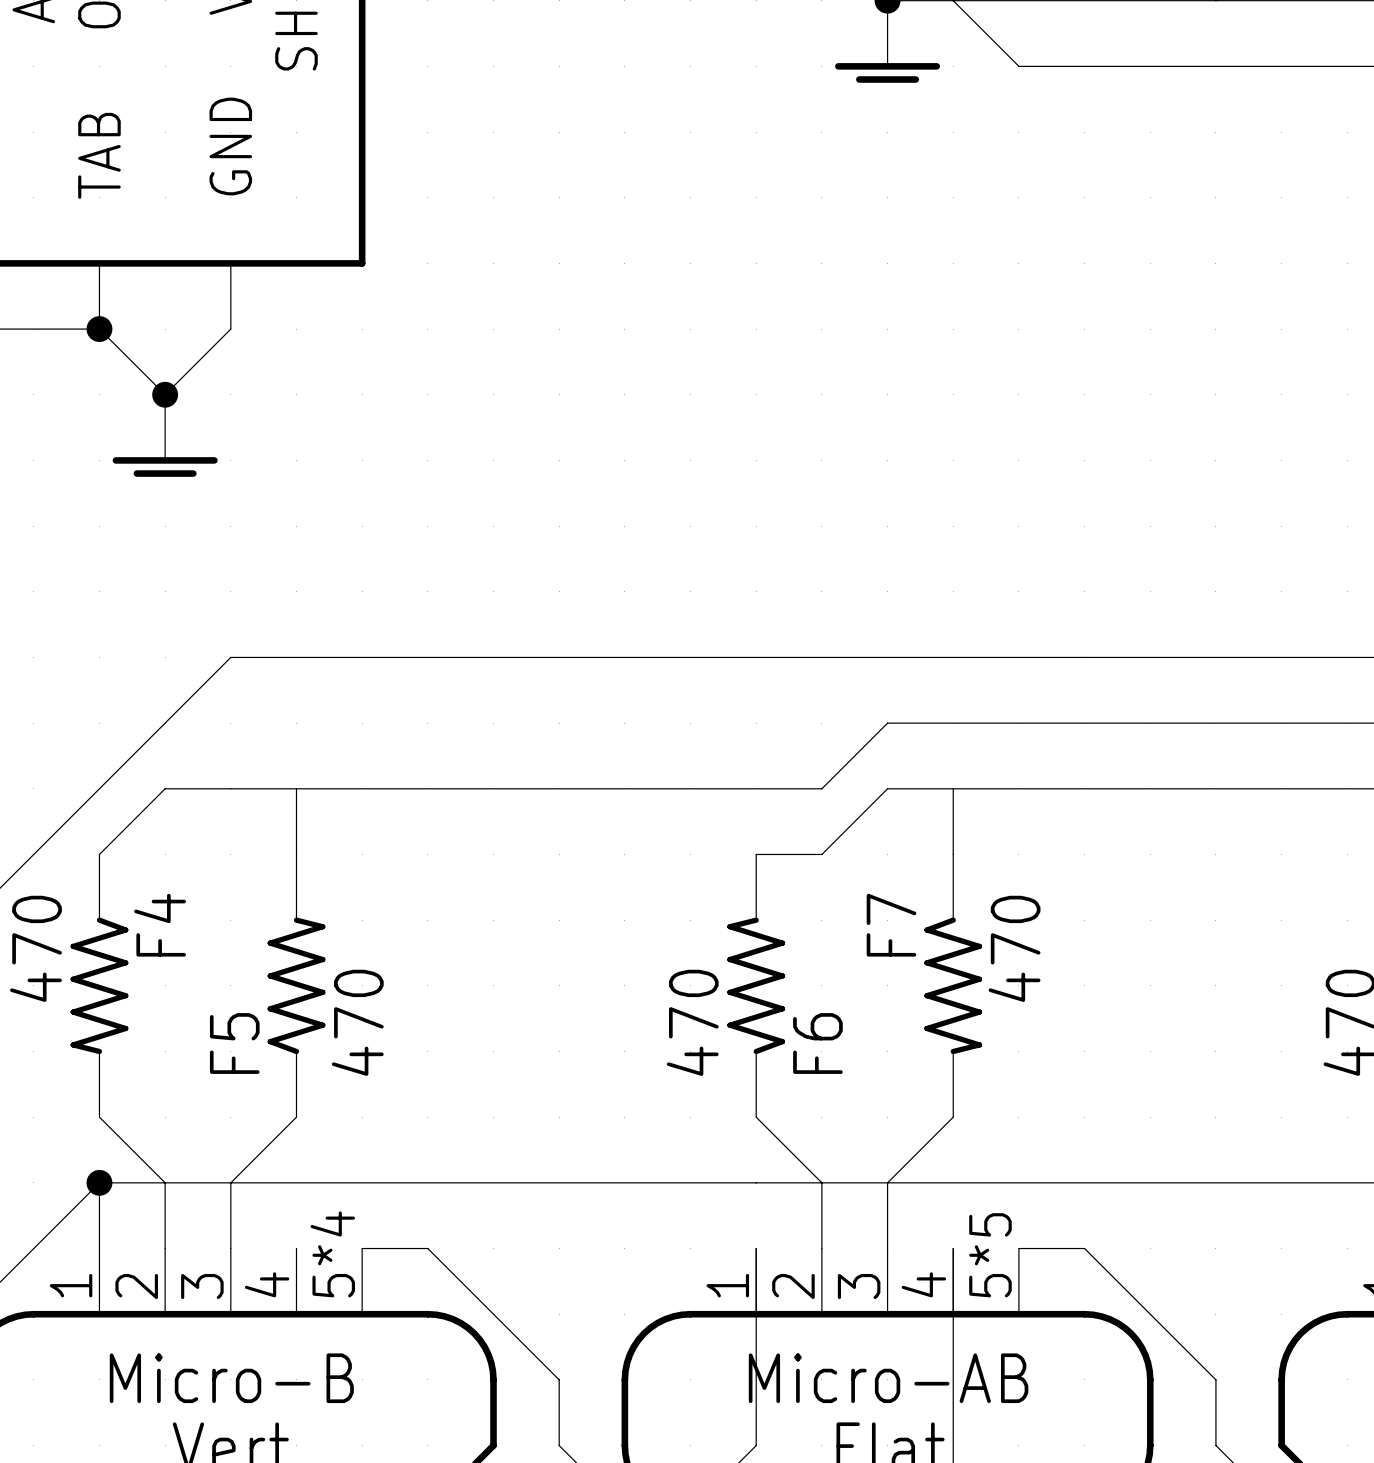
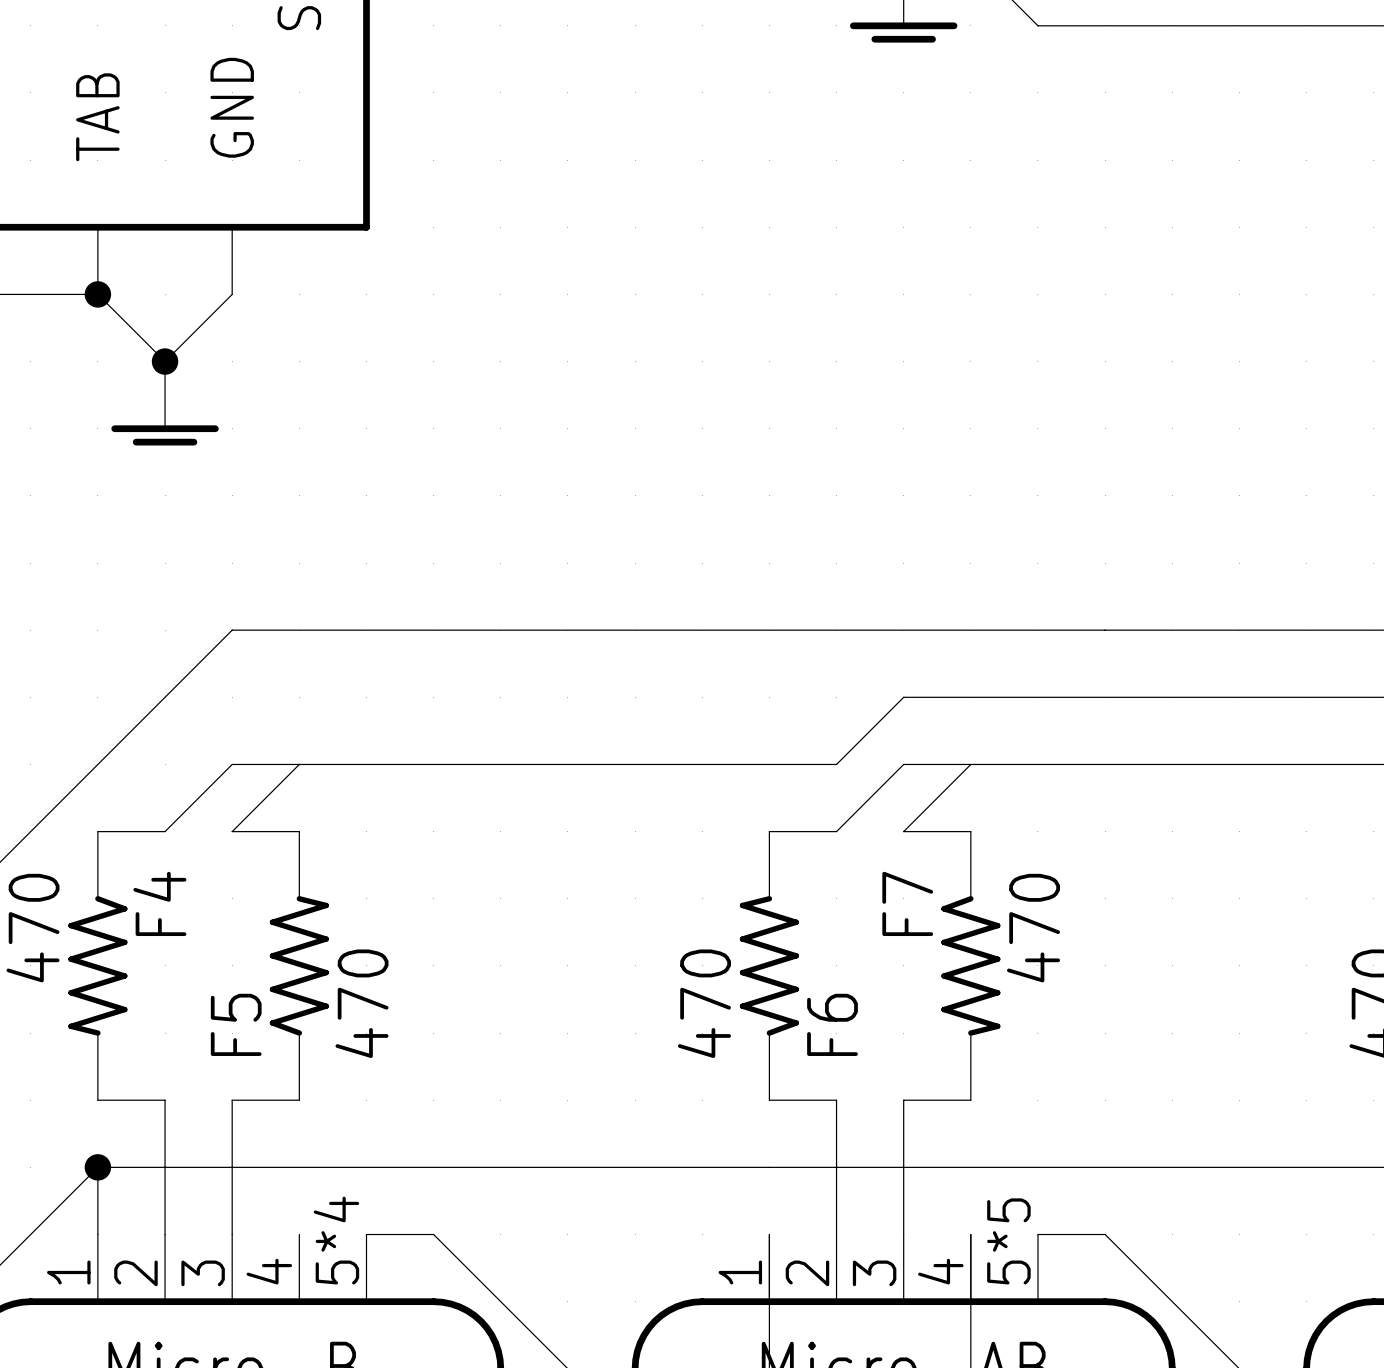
wire: (230, 788) (165, 788) (99, 854) -> (232, 764) (165, 831) (97, 831)
wire: (296, 788) (296, 854) -> (299, 764) (232, 831) (299, 831)
wire: (953, 788) (953, 854) -> (970, 764) (903, 831) (970, 831)
wire: (99, 1117) (165, 1182) -> (97, 1100) (165, 1100) (165, 1167)
wire: (296, 1117) (230, 1182) -> (299, 1100) (232, 1100) (232, 1167)
wire: (756, 1117) (821, 1182) -> (769, 1100) (836, 1100) (836, 1167)
wire: (953, 1117) (887, 1182) -> (970, 1100) (903, 1100) (903, 1167)

